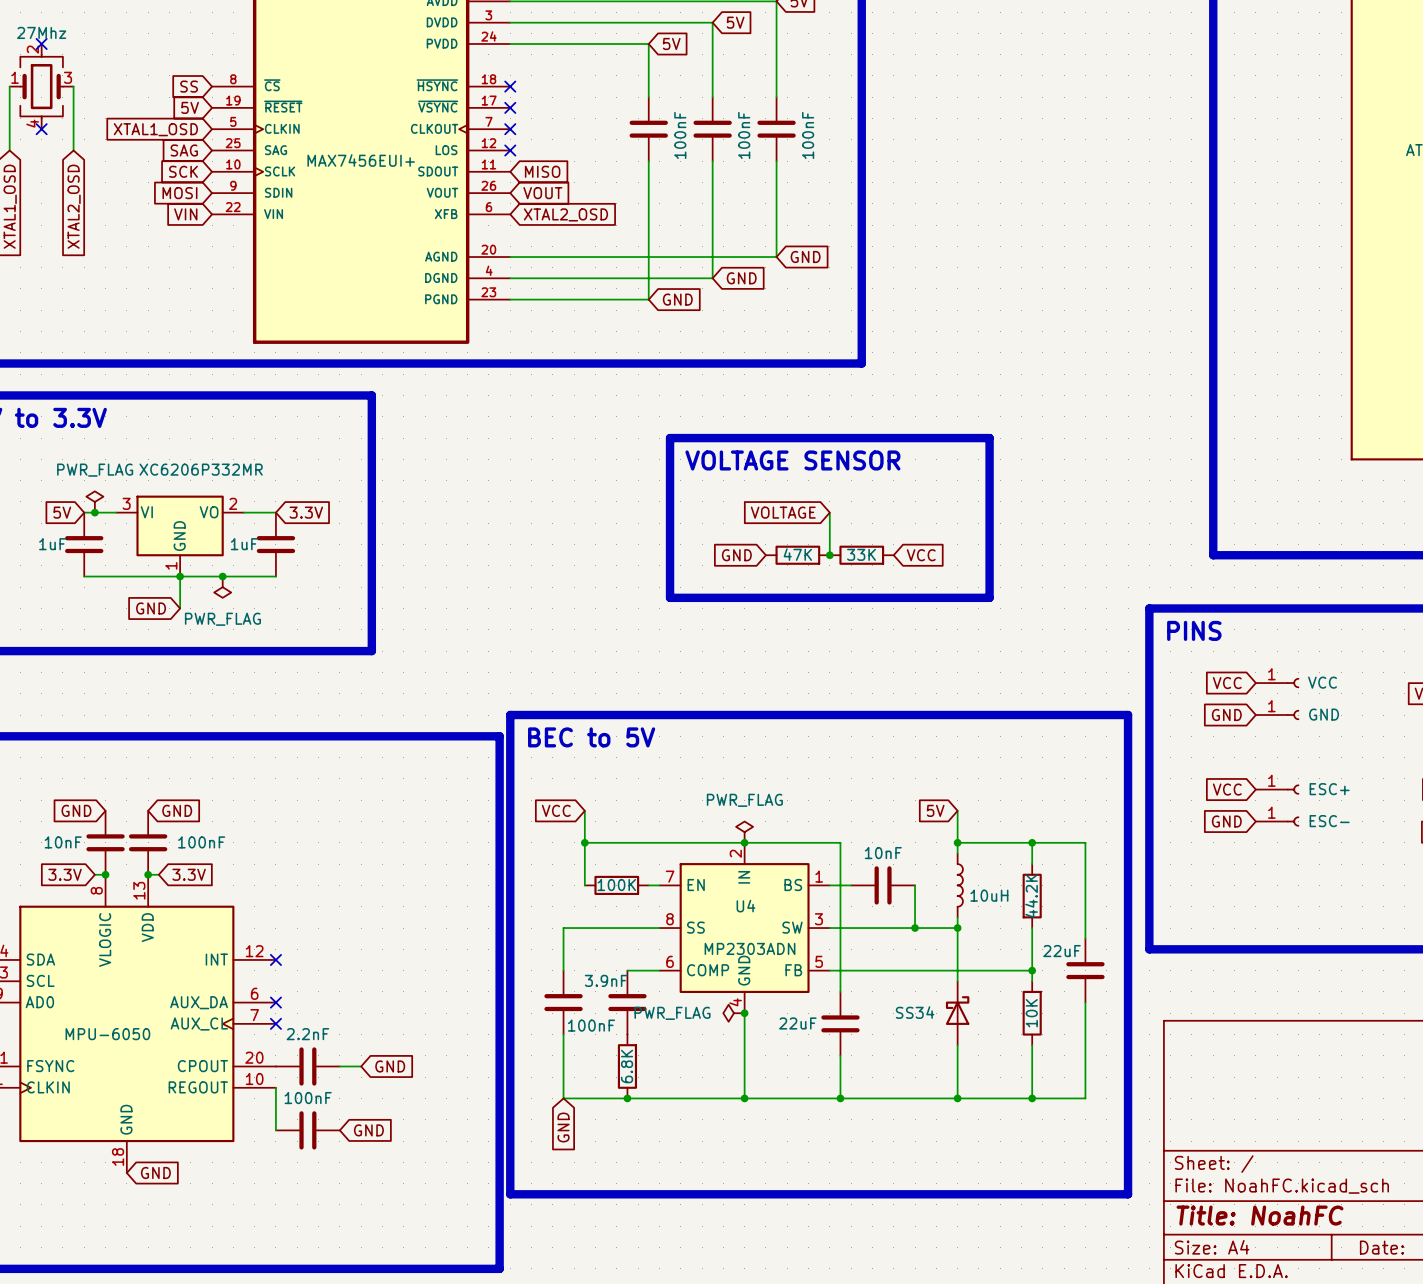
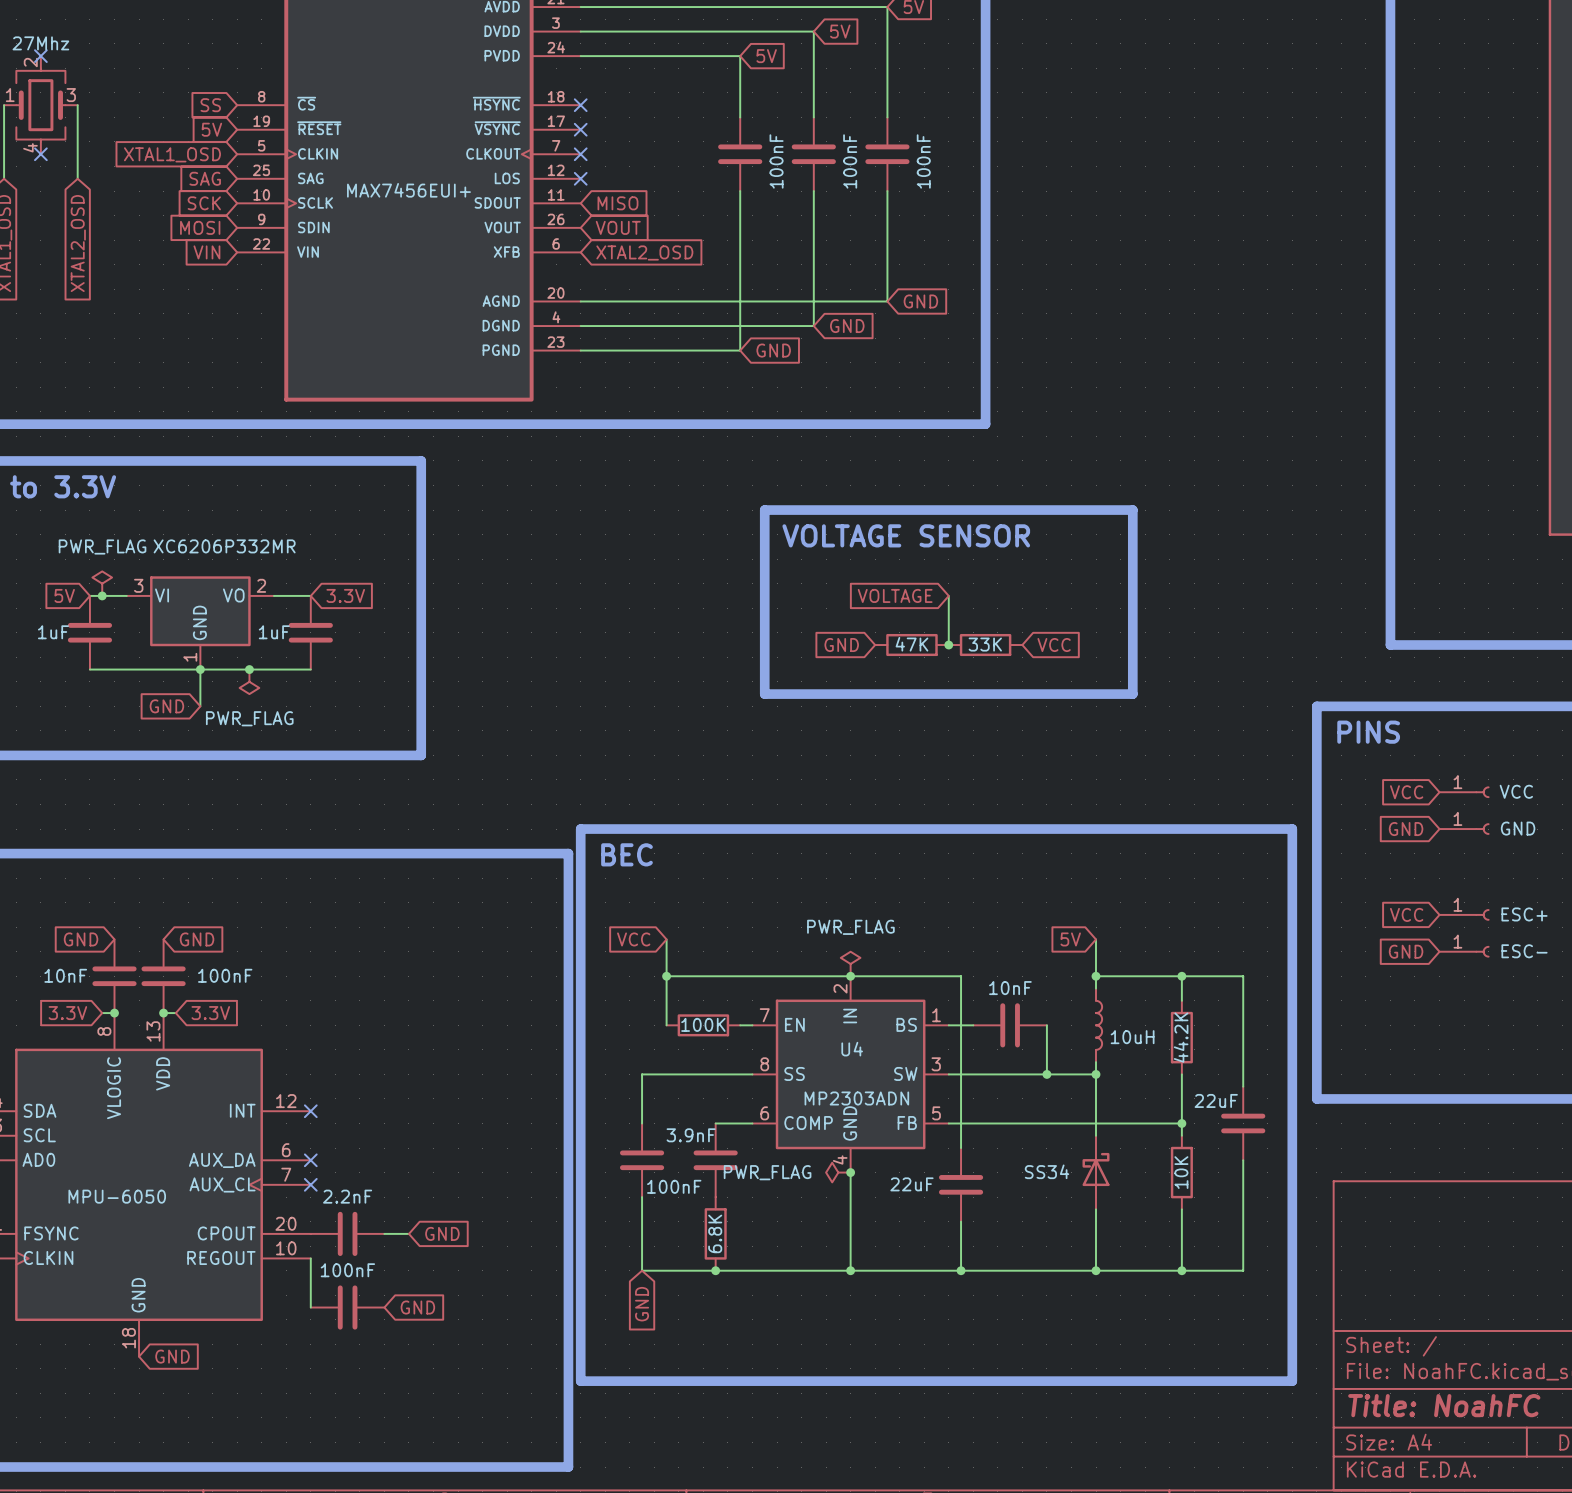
text: BEC to 5V (591, 737) -> BEC (627, 854)

